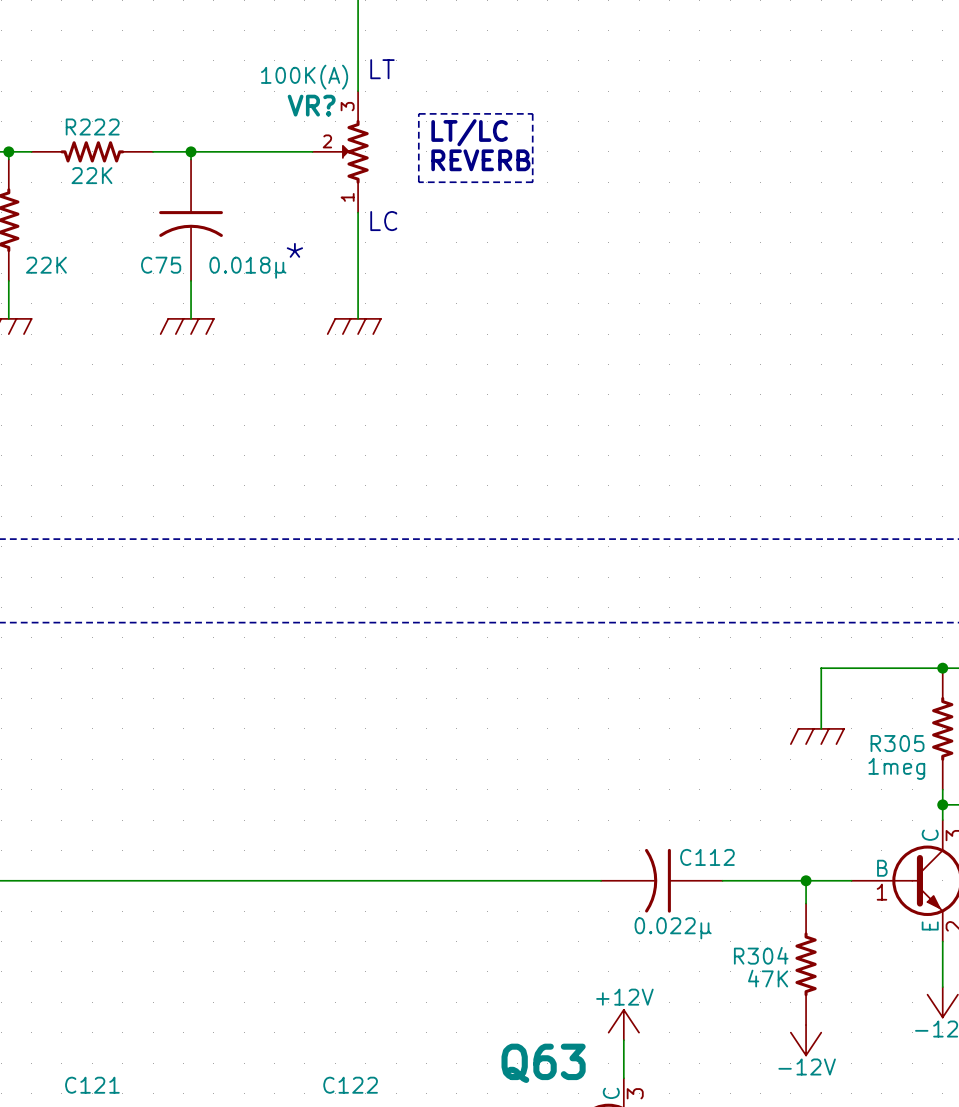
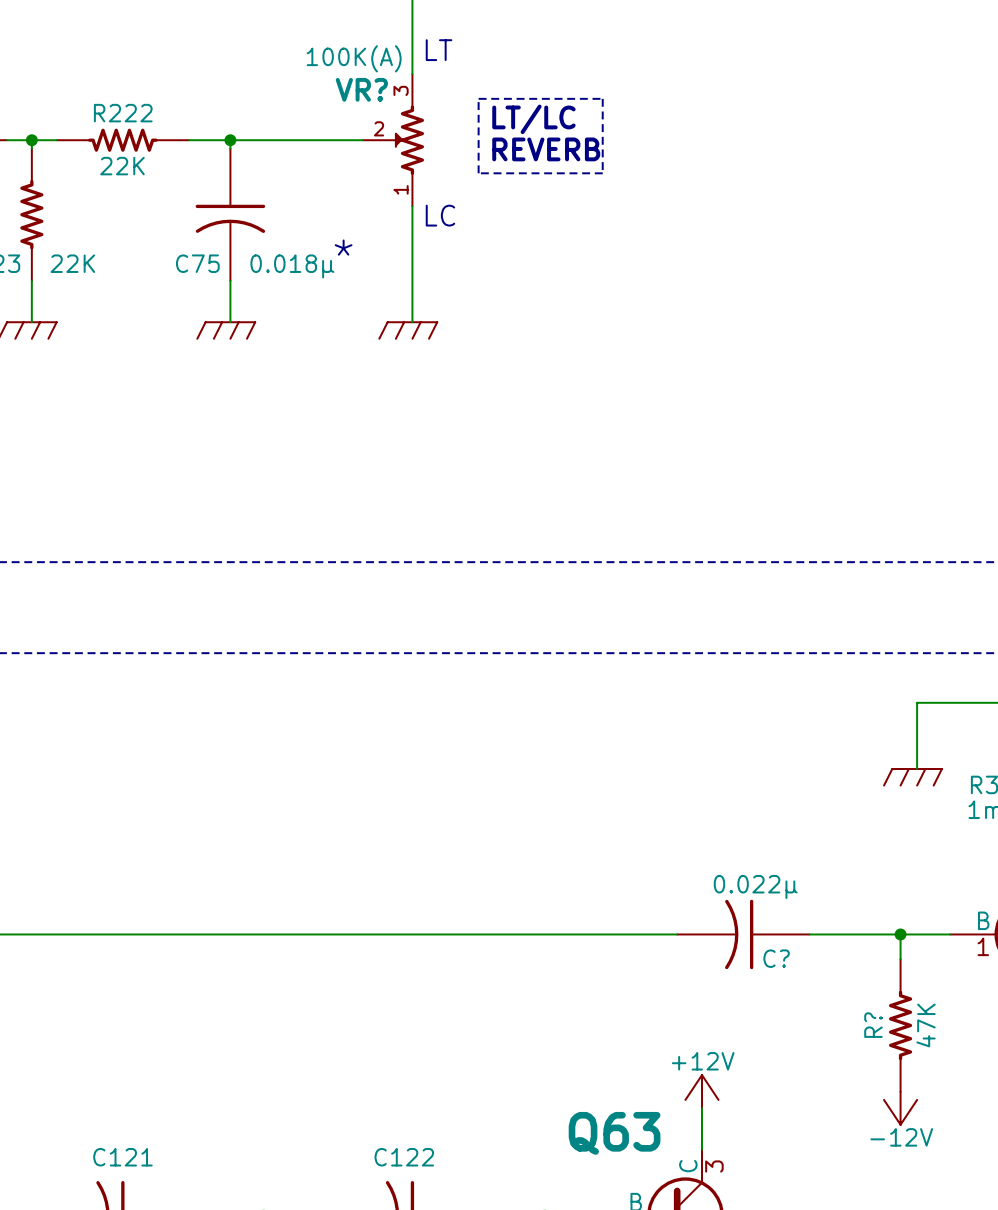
C112: 0.022μ (661, 880) -> none
C?: none -> 0.022μ (743, 934)
R304 name: R304 (761, 955) -> R? (873, 1025)
R304 value rotation: 0° (768, 978) -> 90° counterclockwise (926, 1025)
R304 value position: 47K (768, 978) -> 47K (926, 1025)

